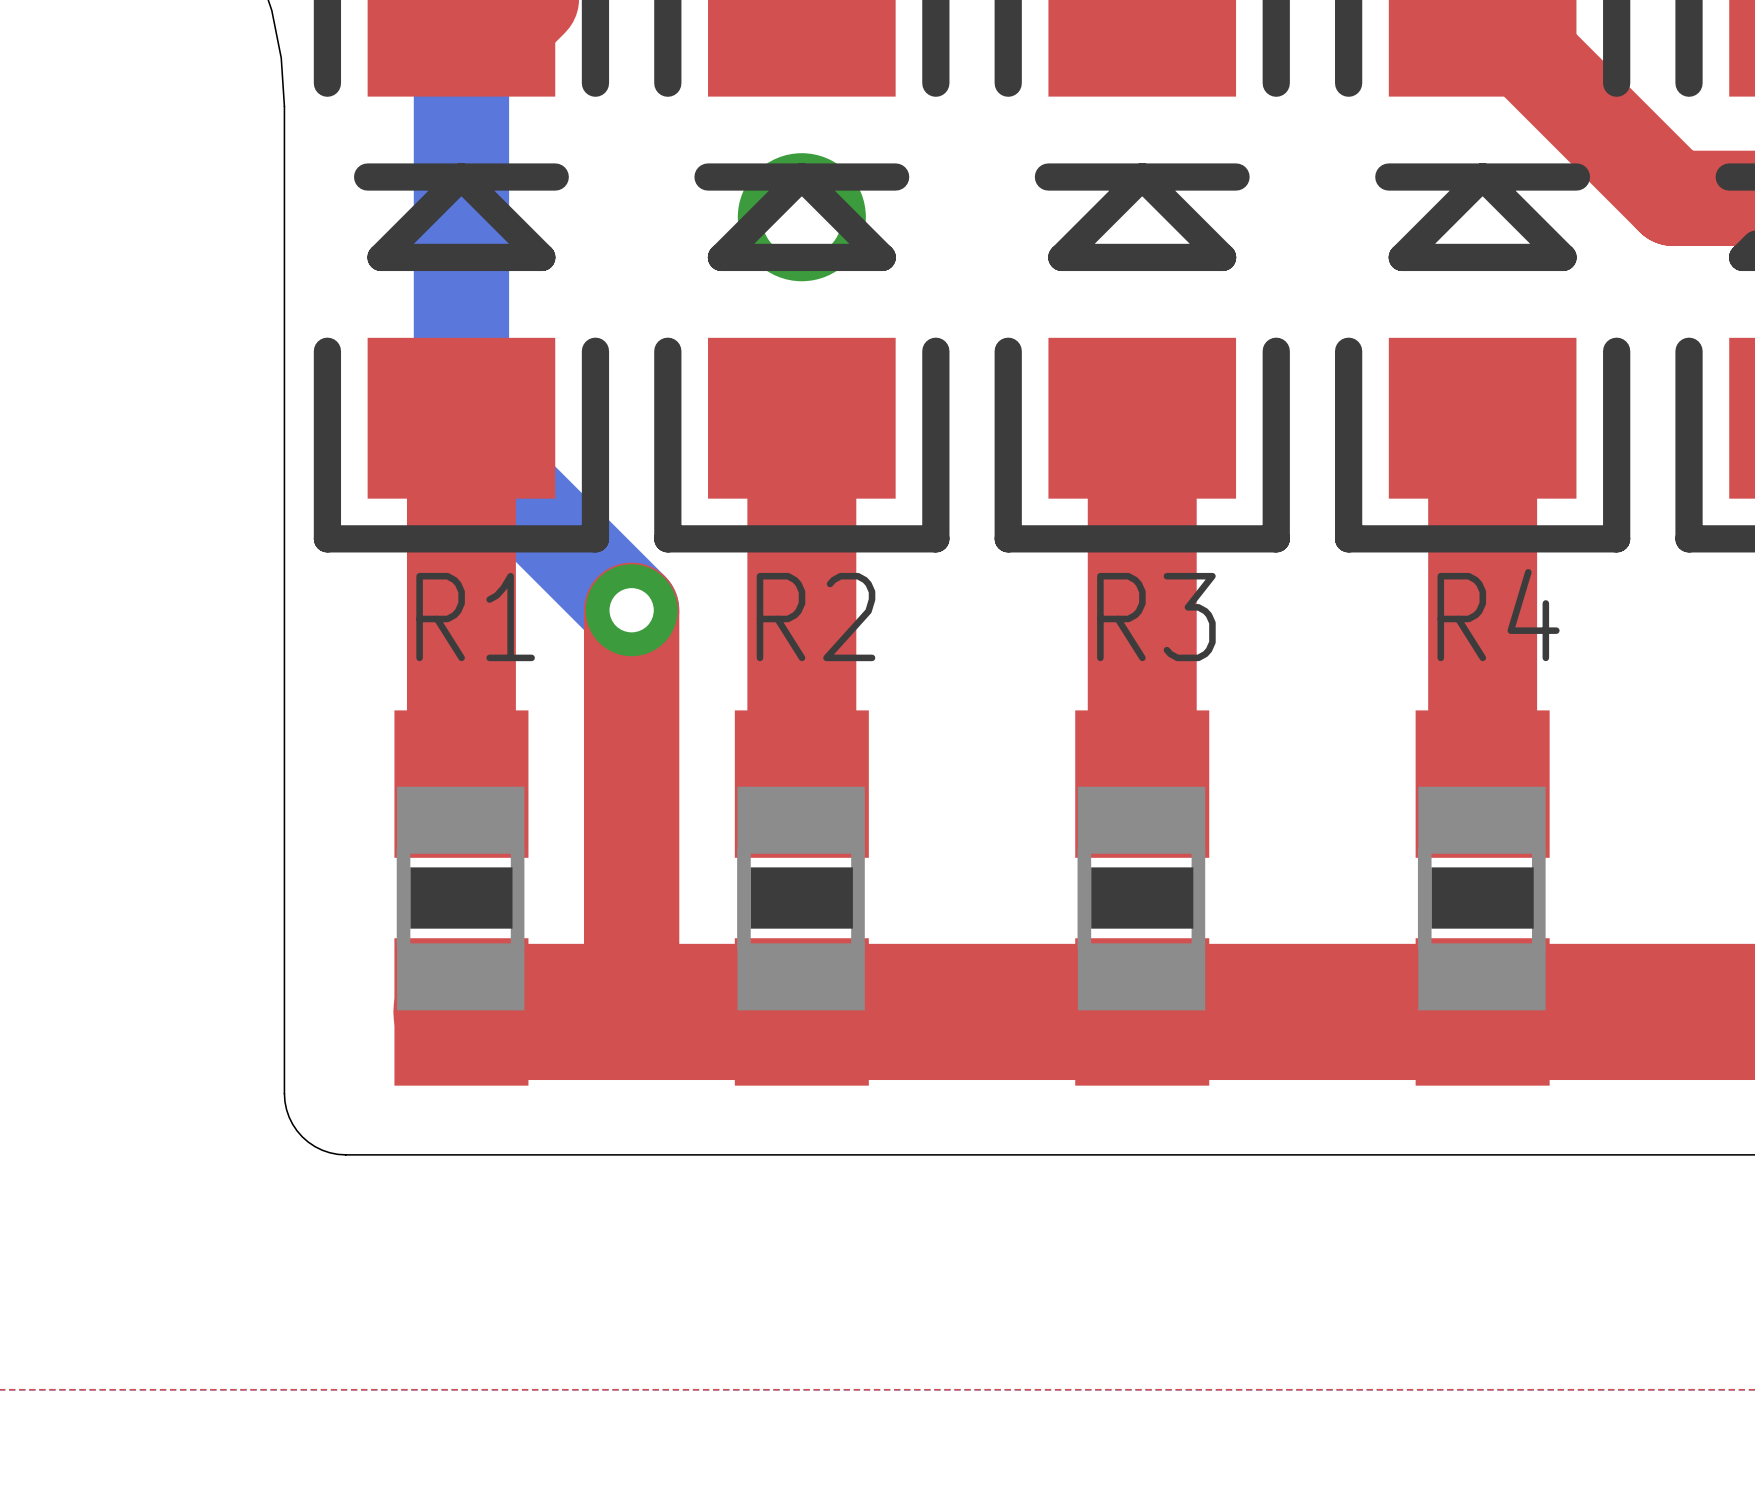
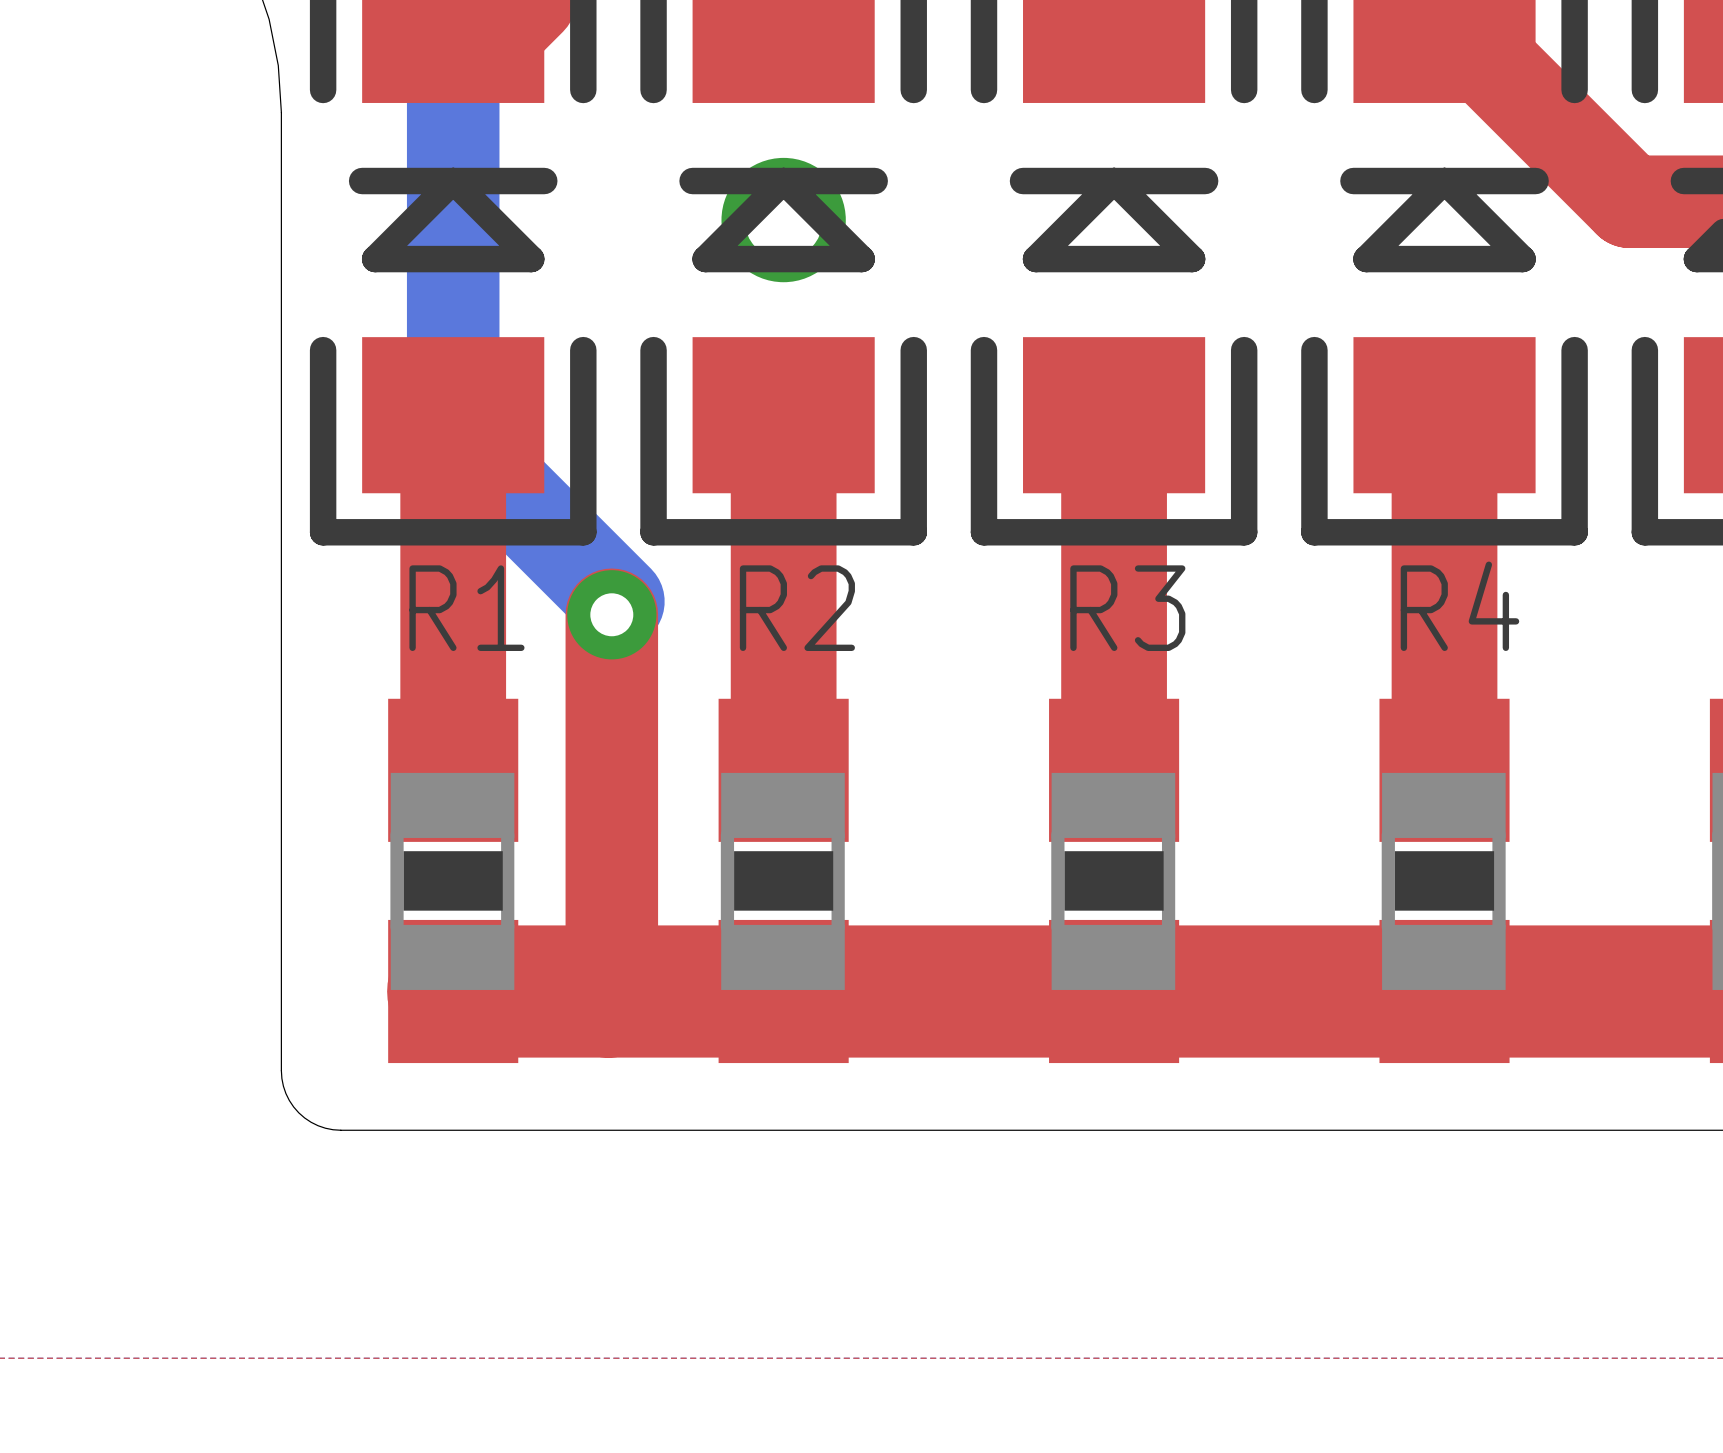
top track: (631, 610) (631, 1001) (624, 1008) -> (611, 614) (611, 988)
via position: (631, 610) -> (611, 614)

